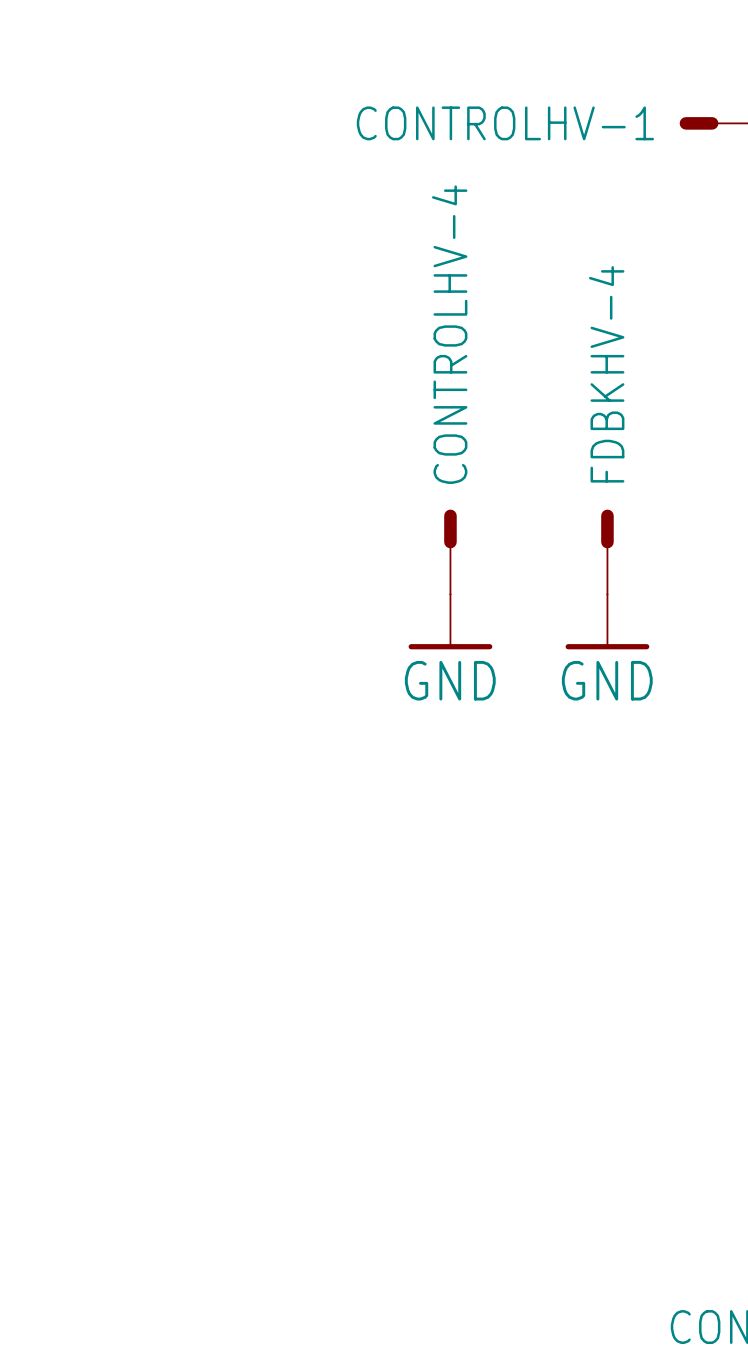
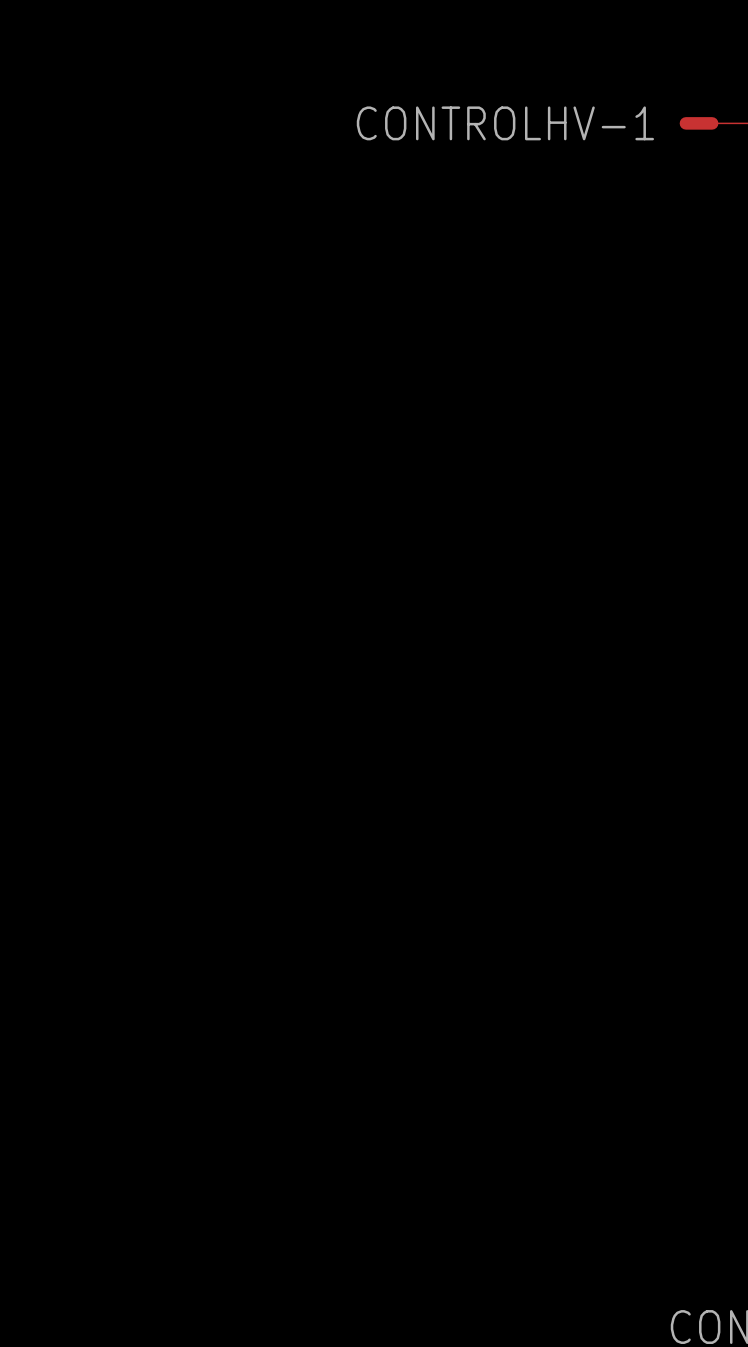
CONTROLHV-4: (450, 551) -> none
FDBKHV-4: (607, 551) -> none
power symbol: GND (450, 621) -> none
power symbol: GND (607, 621) -> none

